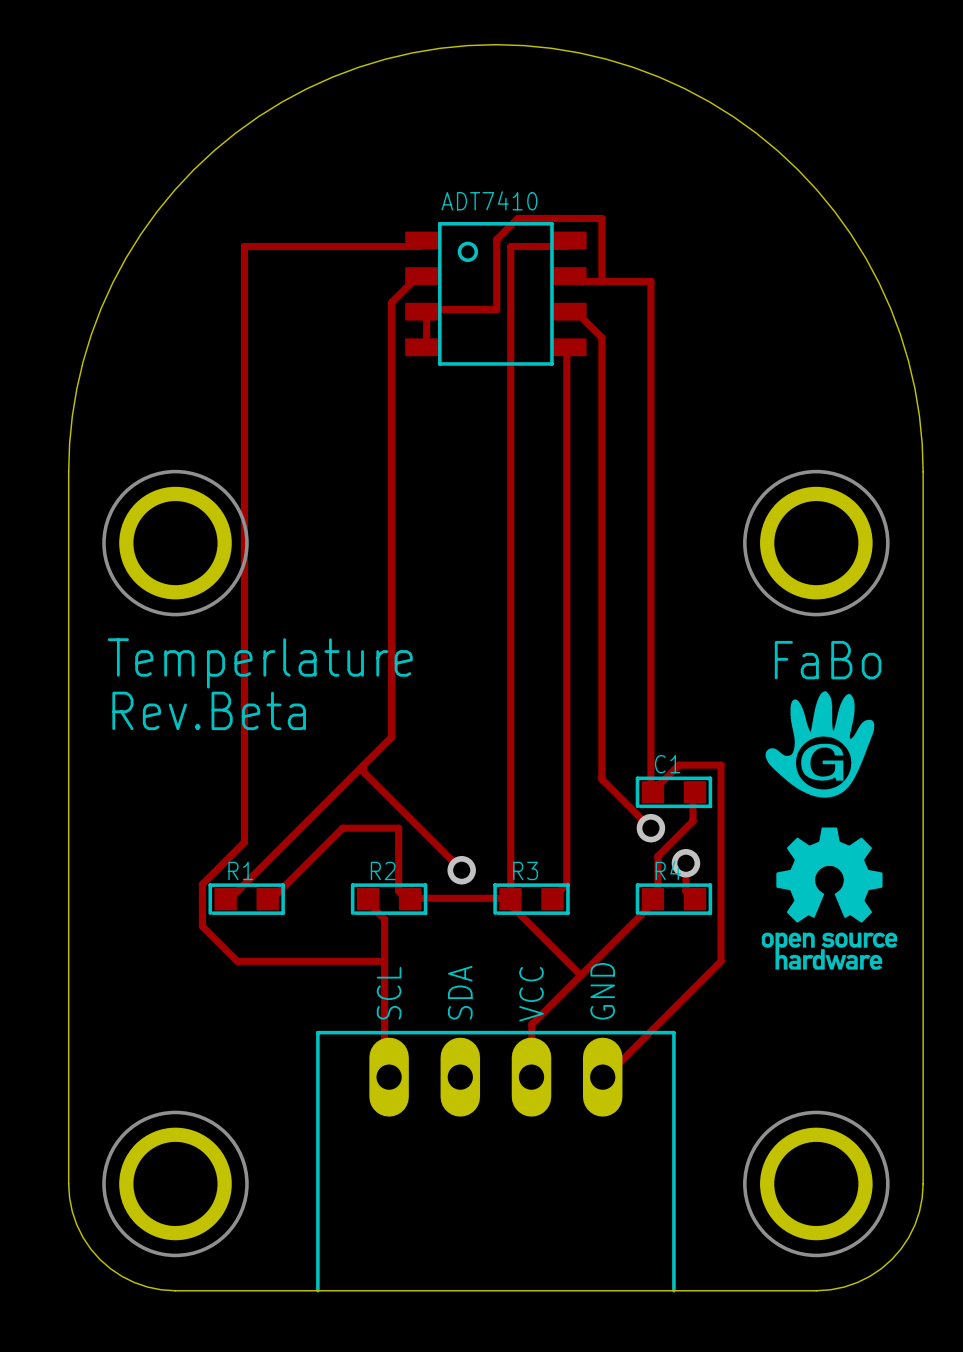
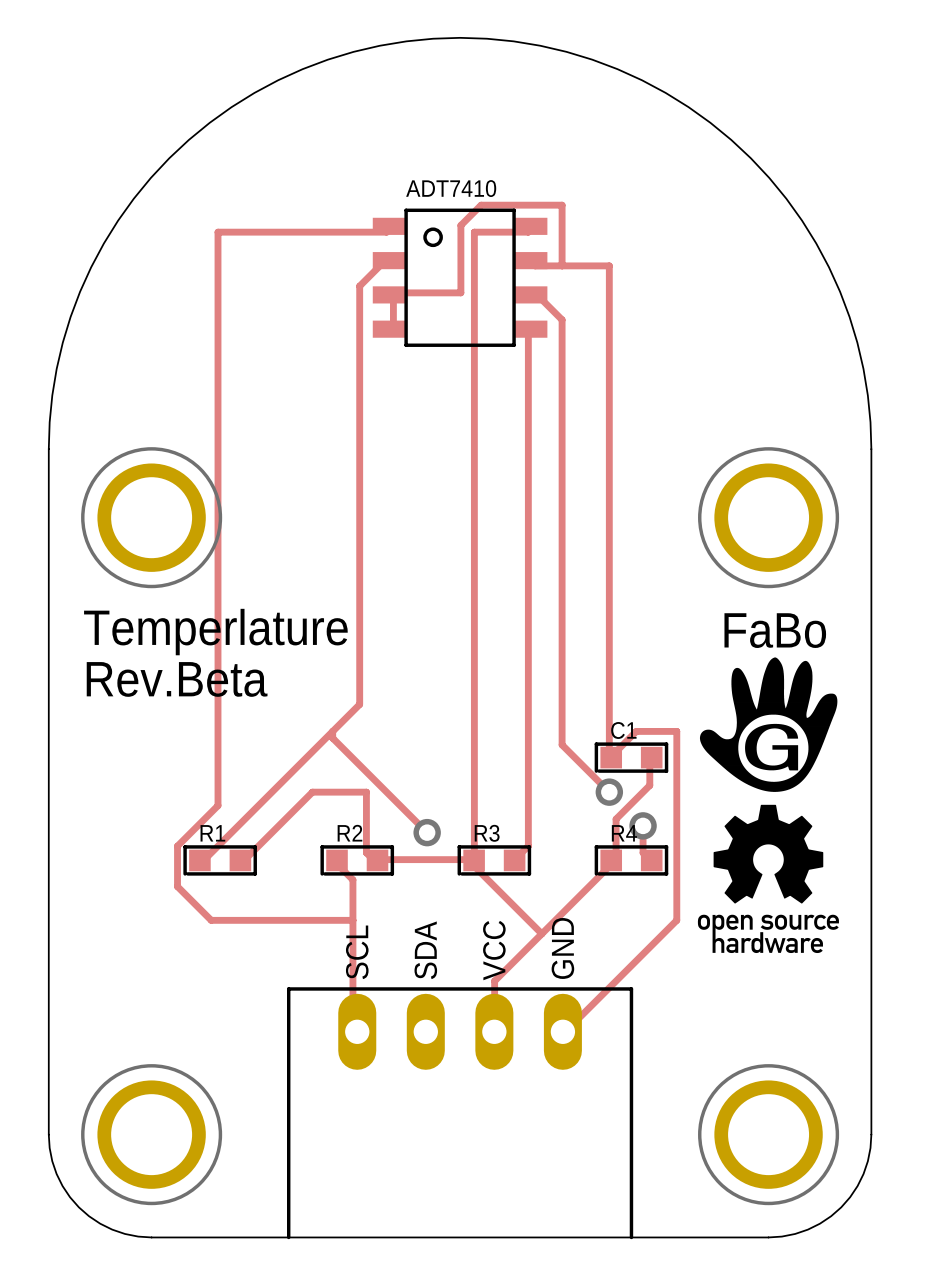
drawing shape: [765, 691, 875, 798] -> [699, 657, 838, 792]
drawing shape: [761, 827, 898, 970] -> [697, 804, 839, 954]

